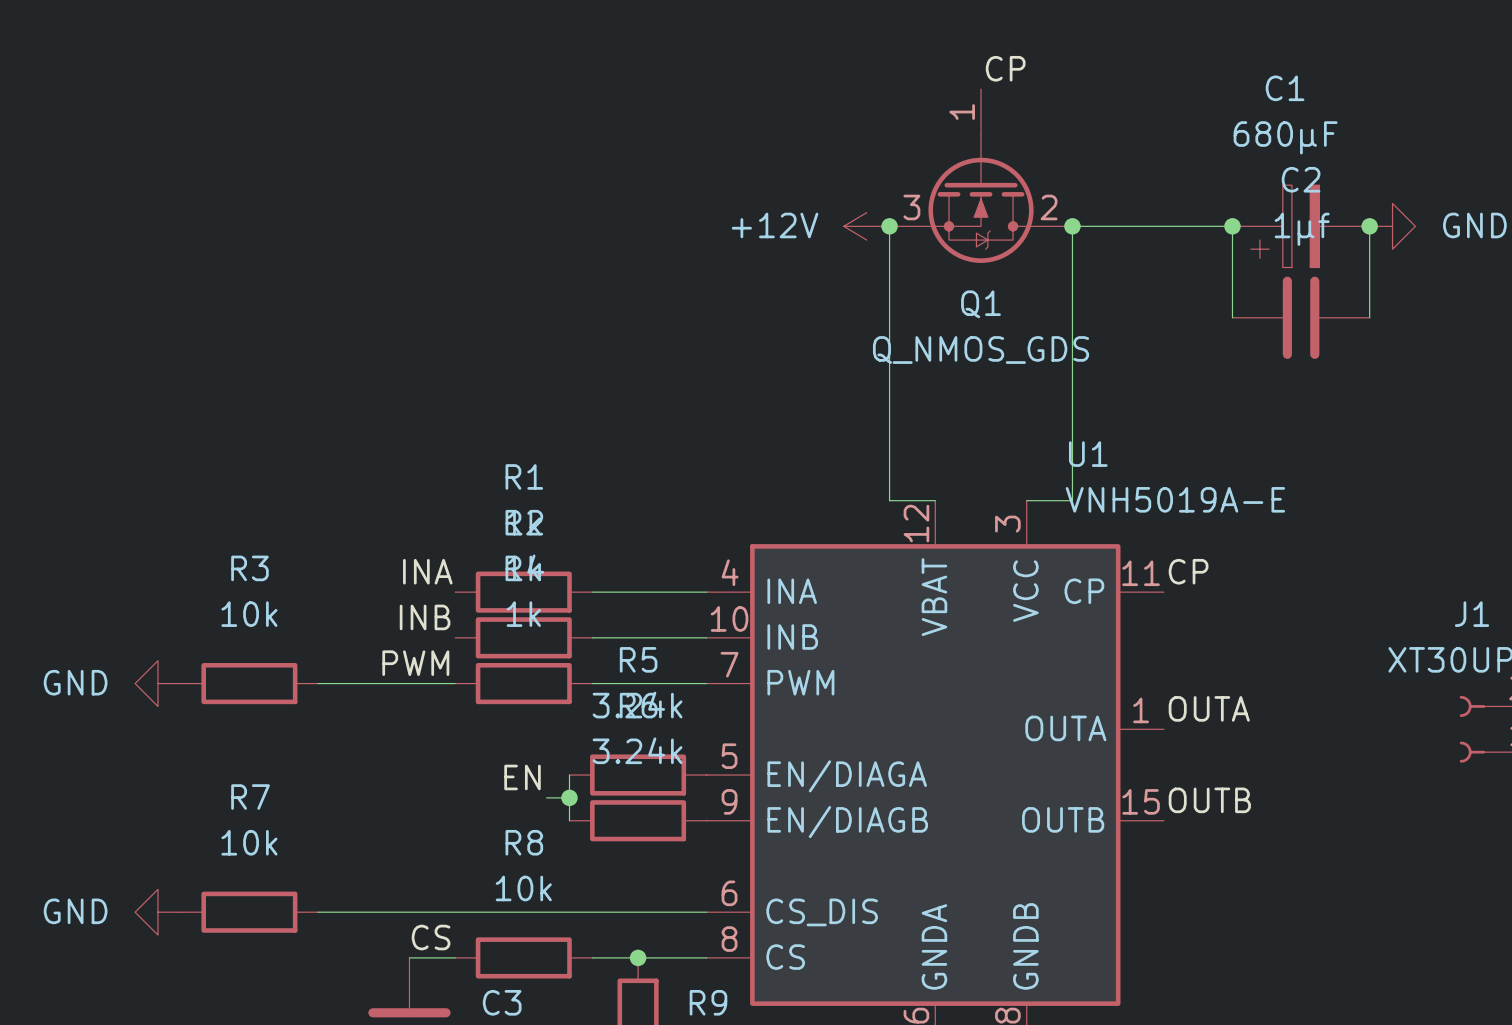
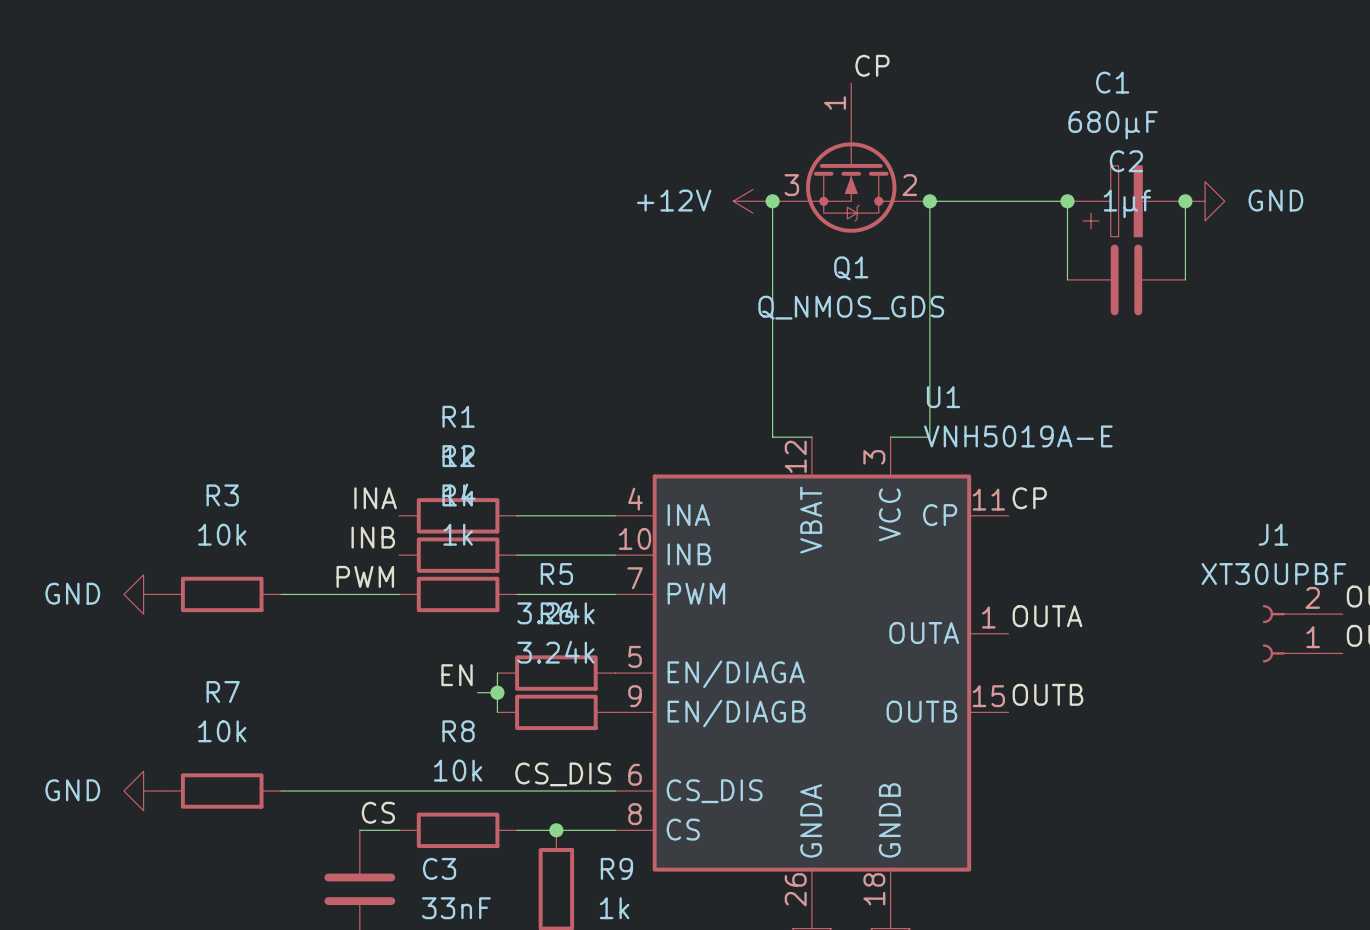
label: none -> CS_DIS (563, 774)

